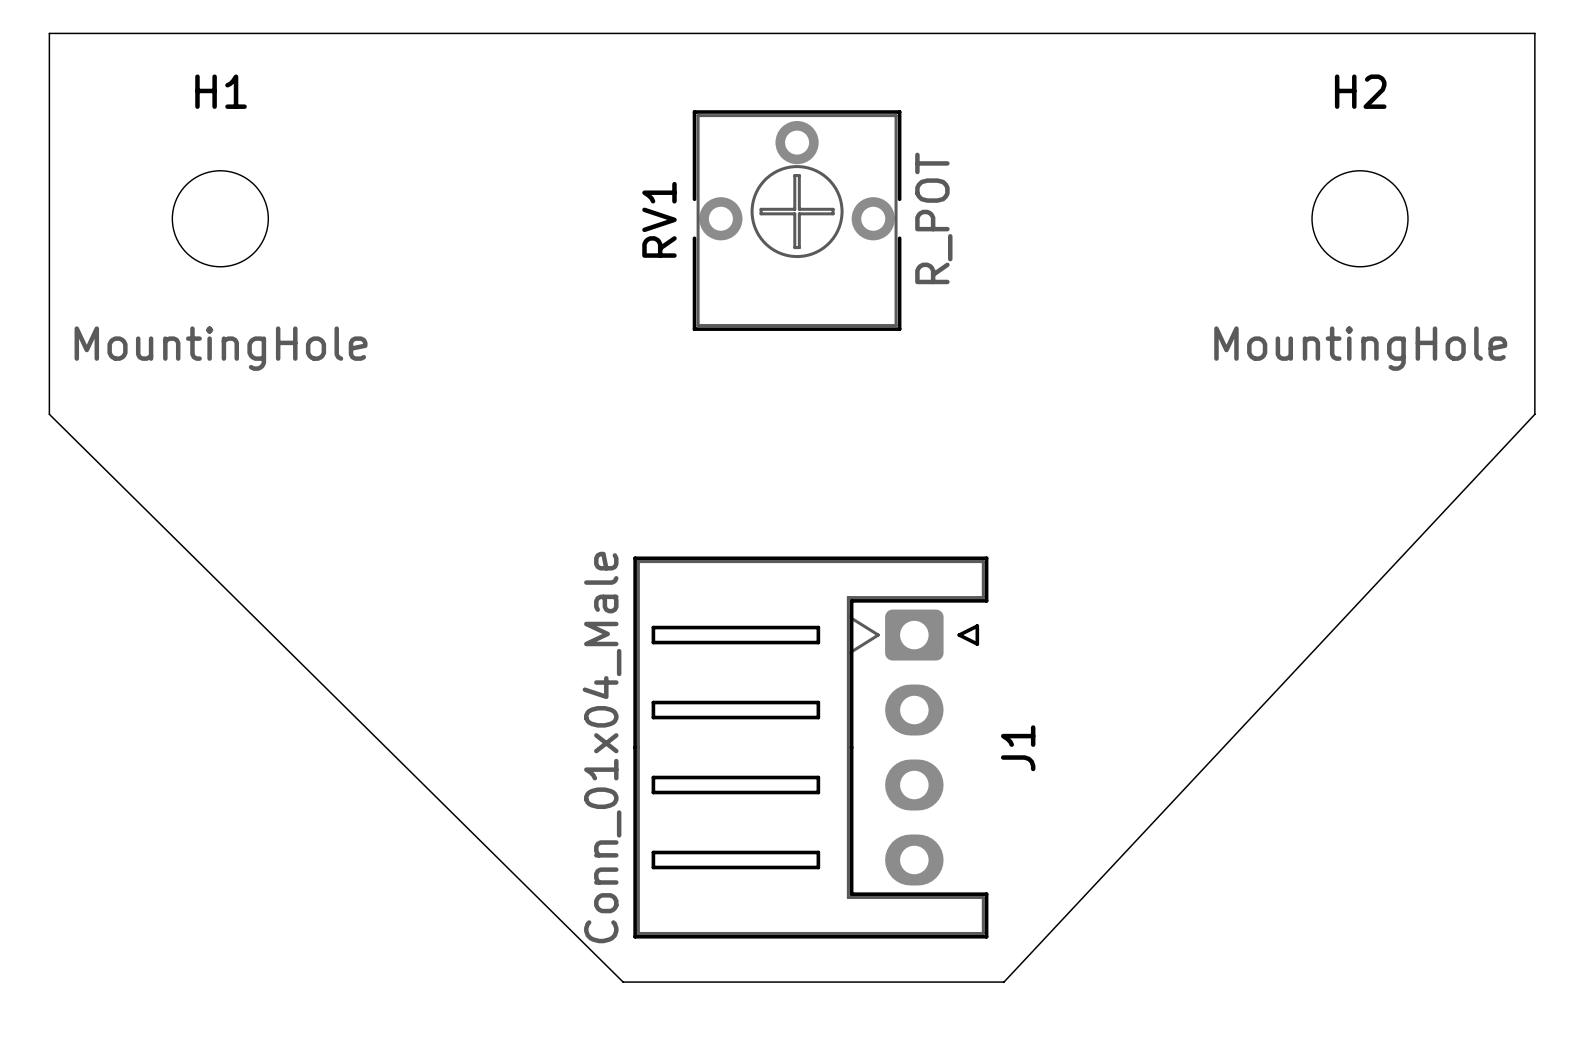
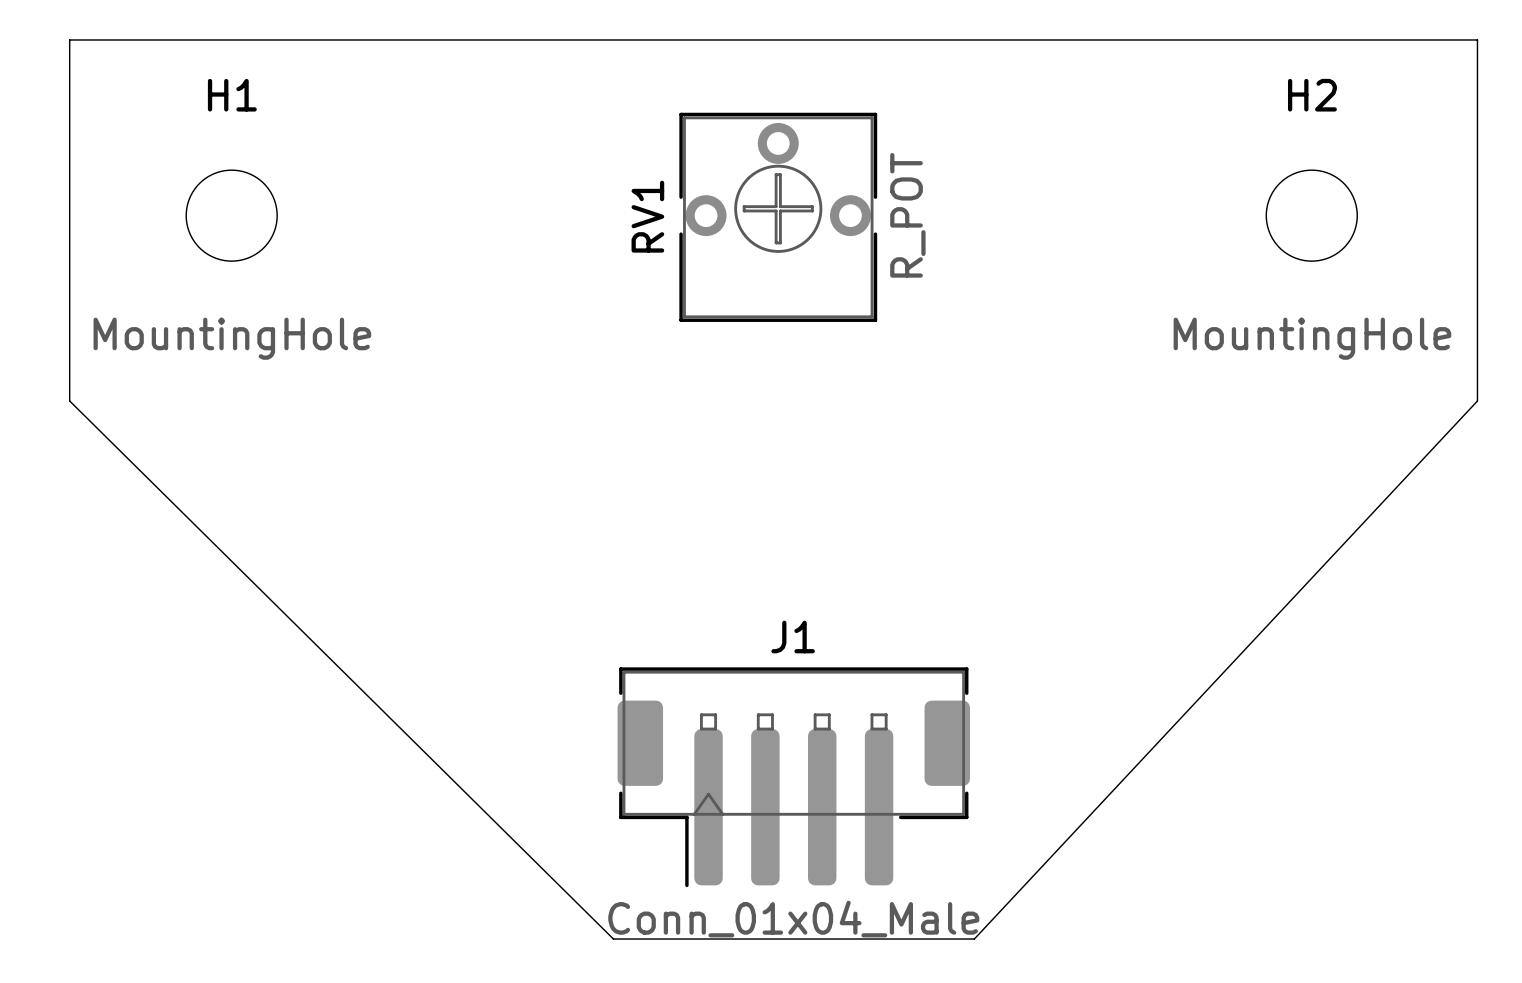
J1 footprint: [633, 556, 989, 939] -> [617, 667, 971, 888]
J1 value position: Conn_01x04_Male (602, 747) -> Conn_01x04_Male (793, 919)
J1 name position: J1 (1018, 748) -> J1 (793, 637)

